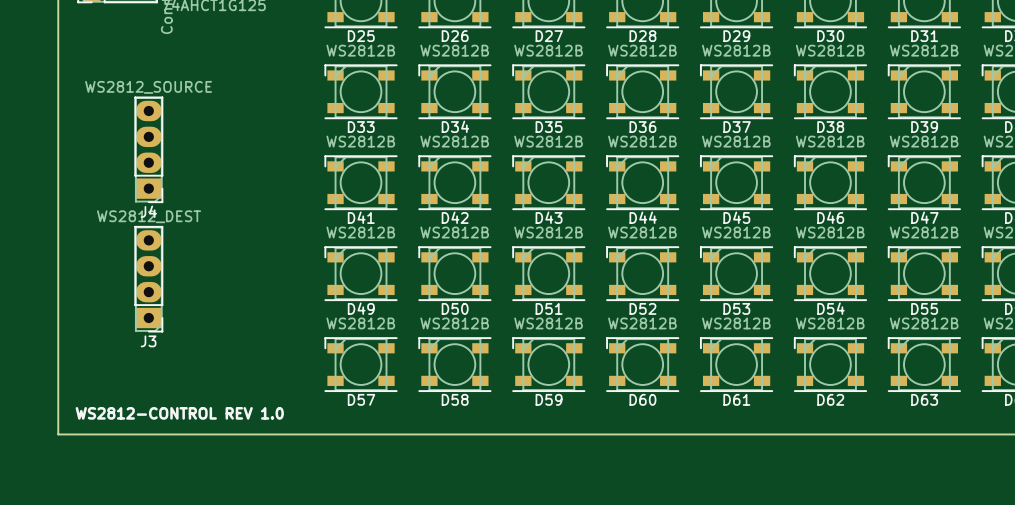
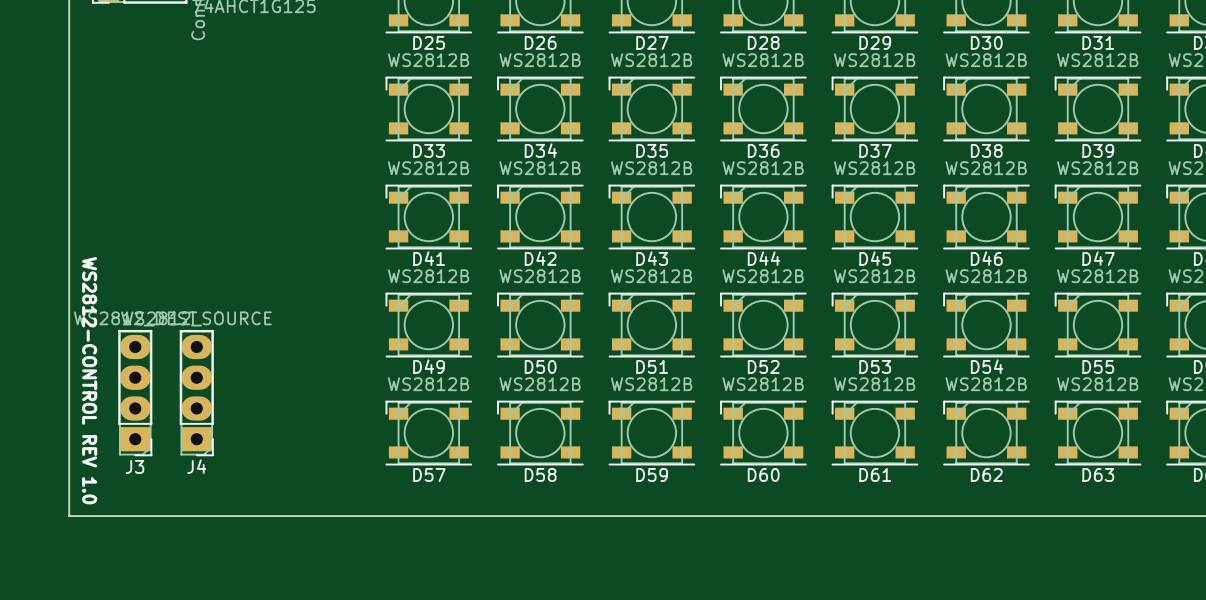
J4 position: (148, 149) -> (196, 393)
J3 position: (148, 279) -> (135, 393)
text rotation: 0° (179, 413) -> 90° clockwise (89, 380)

